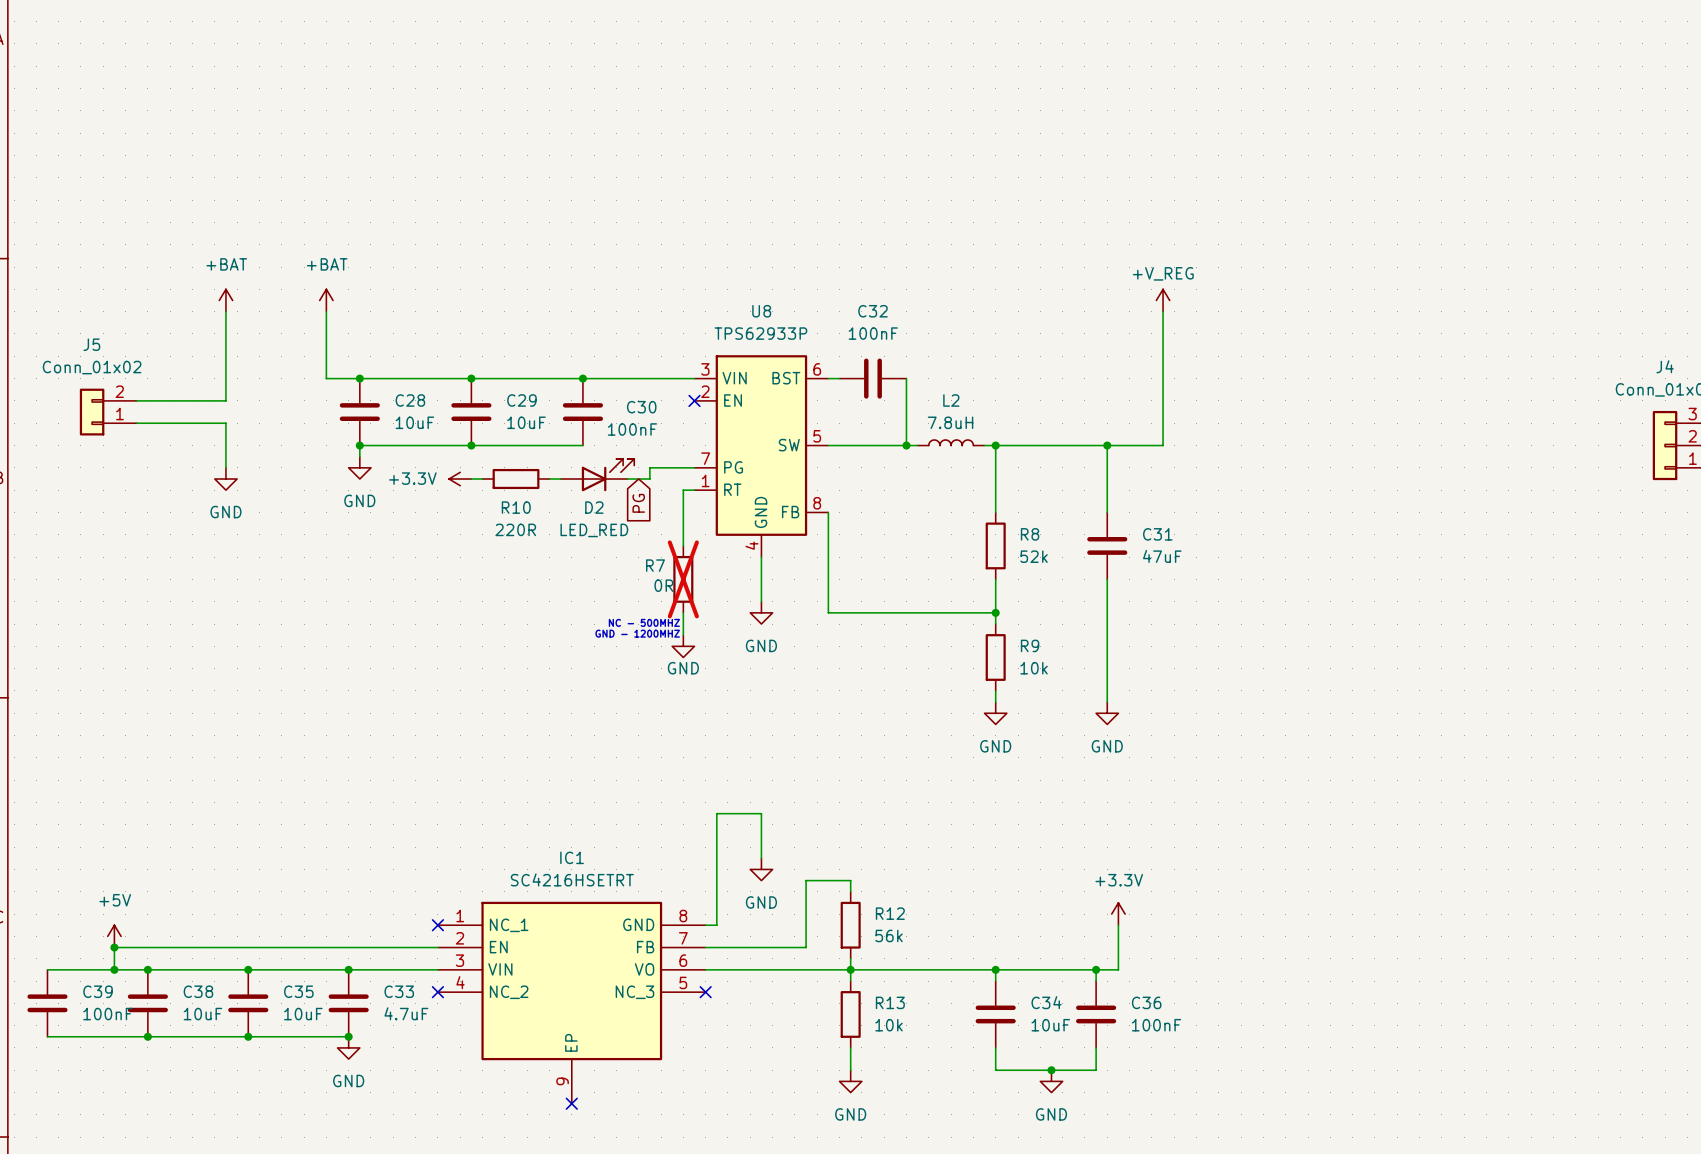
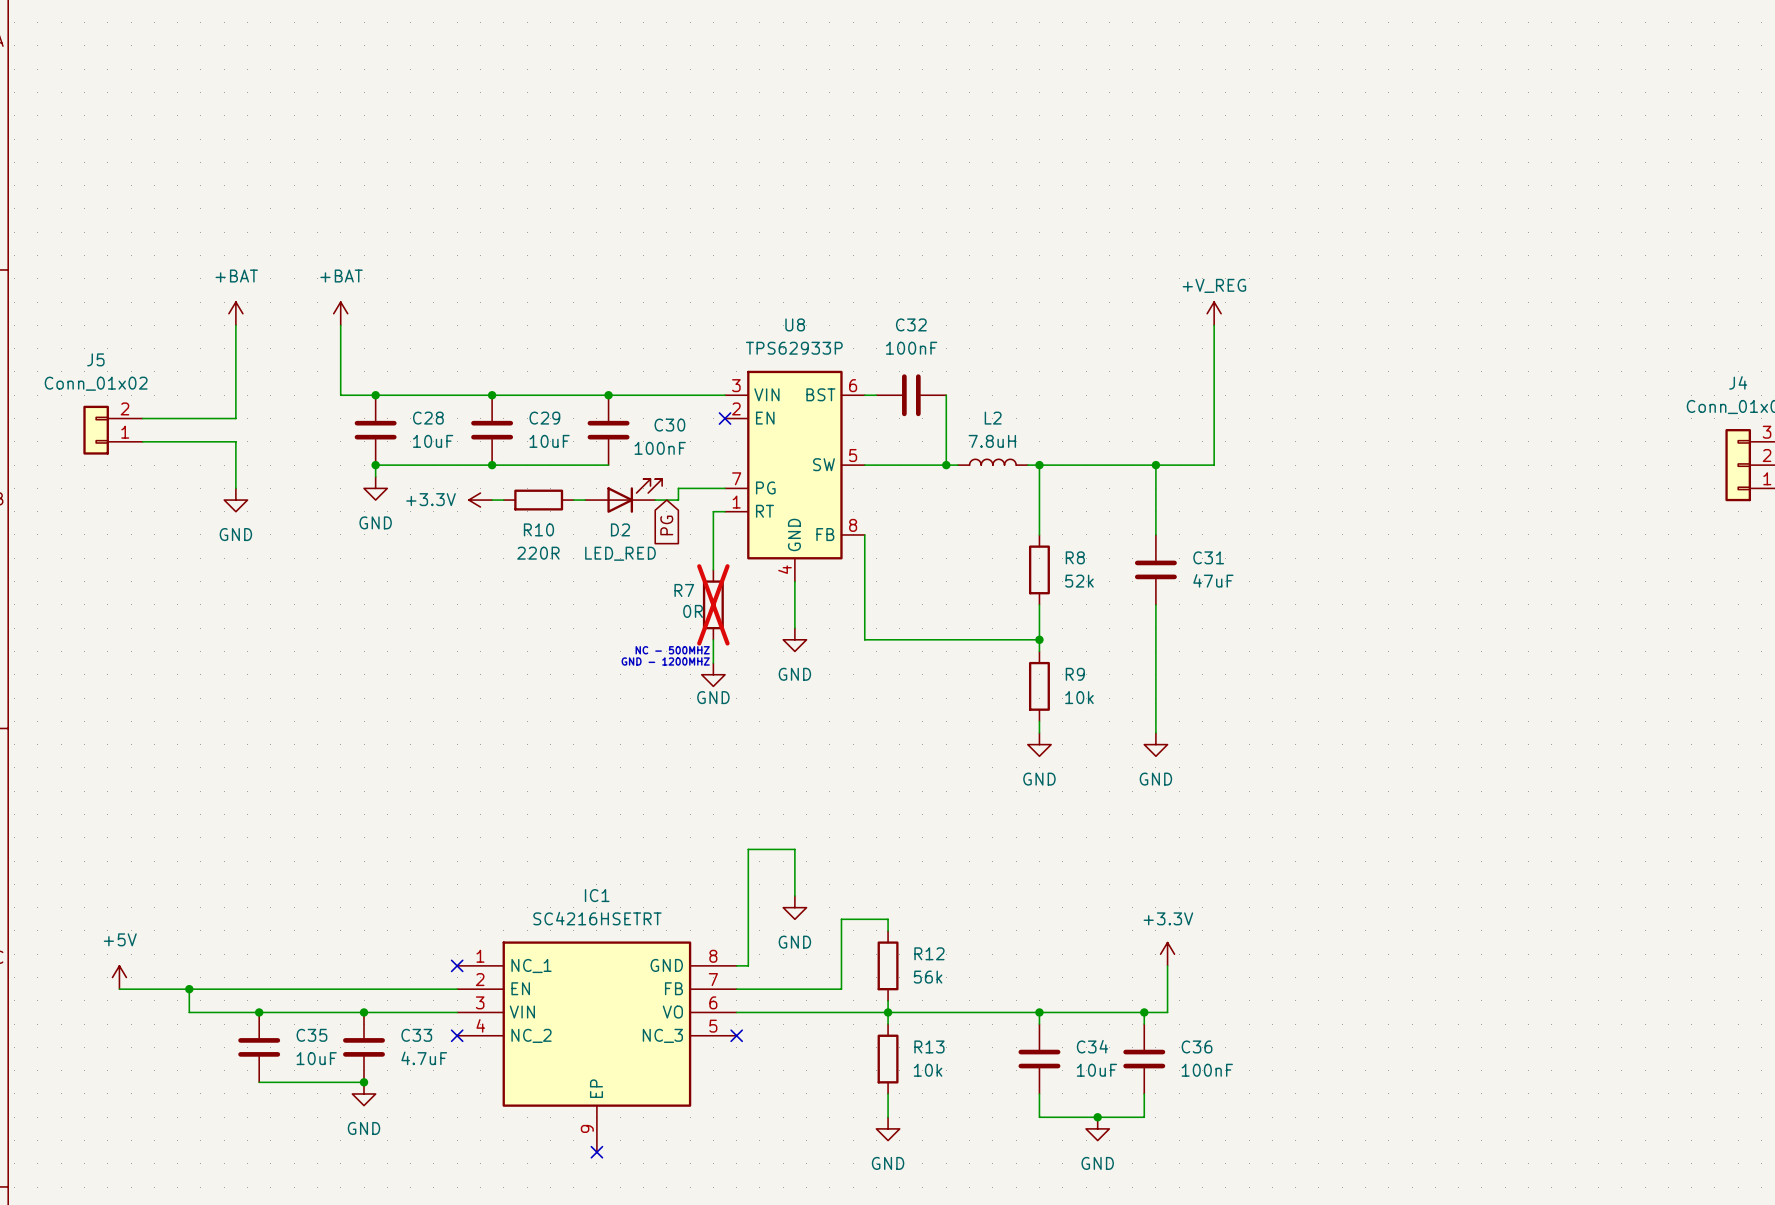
wire: (114, 947) (114, 969) -> none
junction: (114, 947) -> none
junction: none -> (189, 989)
wire: (47, 969) (181, 969) -> (189, 989) (189, 1012)
junction: (114, 969) -> none
junction: (147, 969) -> none
C39: 100nF (47, 1003) -> none
C38: 10uF (147, 1003) -> none
wire: (47, 1036) (248, 1036) -> none
junction: (147, 1036) -> none
junction: (248, 1036) -> none

